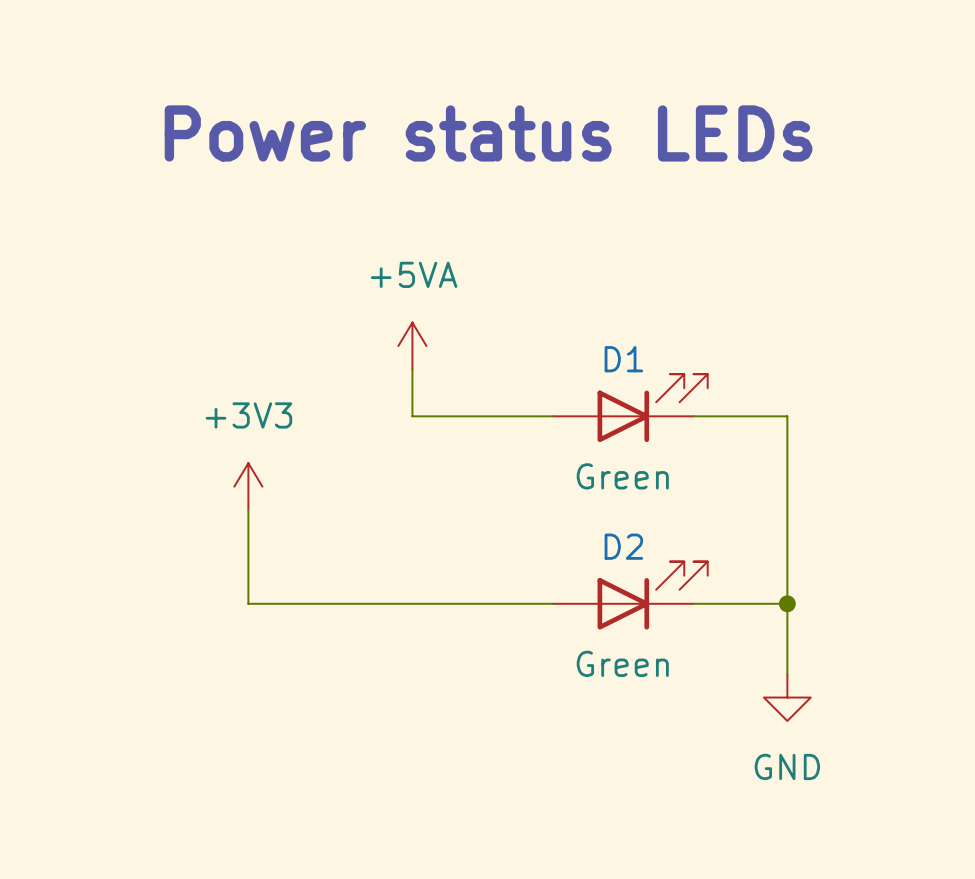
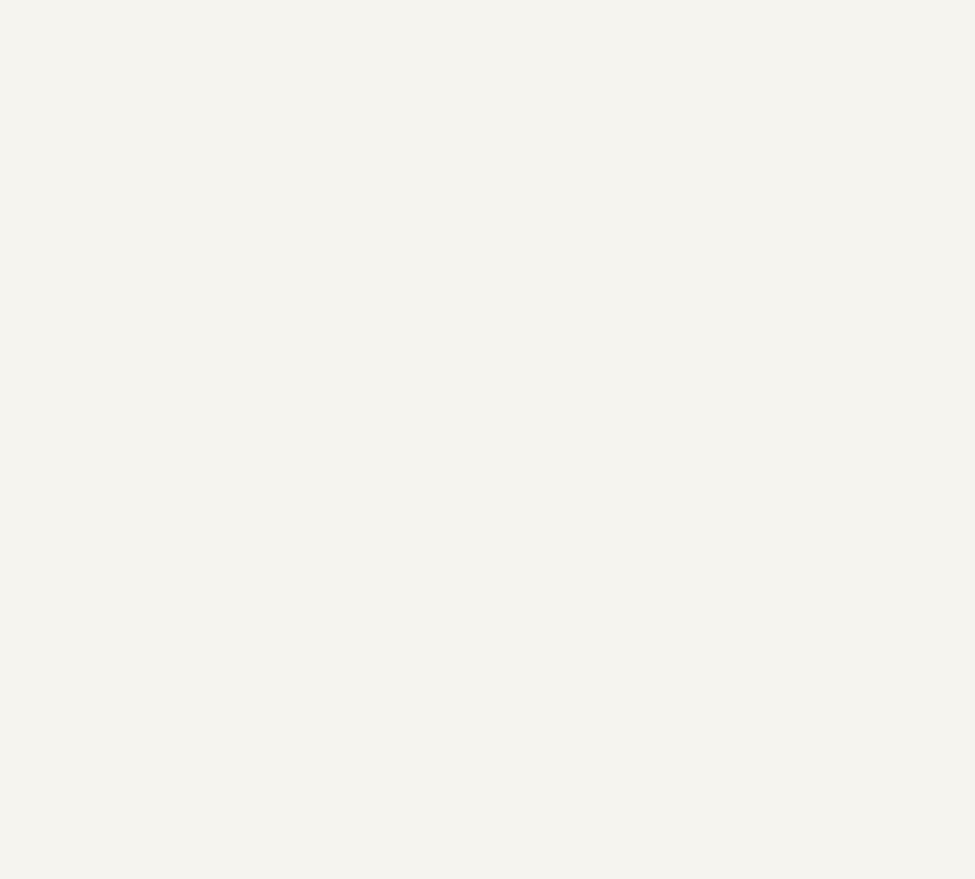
text: Power status LEDs (488, 133) -> none
power symbol: +5VA (412, 346) -> none
wire: (412, 369) (412, 416) (553, 416) -> none
D1: Green (630, 408) -> none
wire: (693, 416) (787, 416) (787, 674) -> none
power symbol: +3V3 (248, 486) -> none
wire: (248, 510) (248, 603) (553, 603) -> none
D2: Green (630, 595) -> none
wire: (693, 603) (787, 603) -> none
junction: (787, 603) -> none
power symbol: GND (787, 697) -> none

